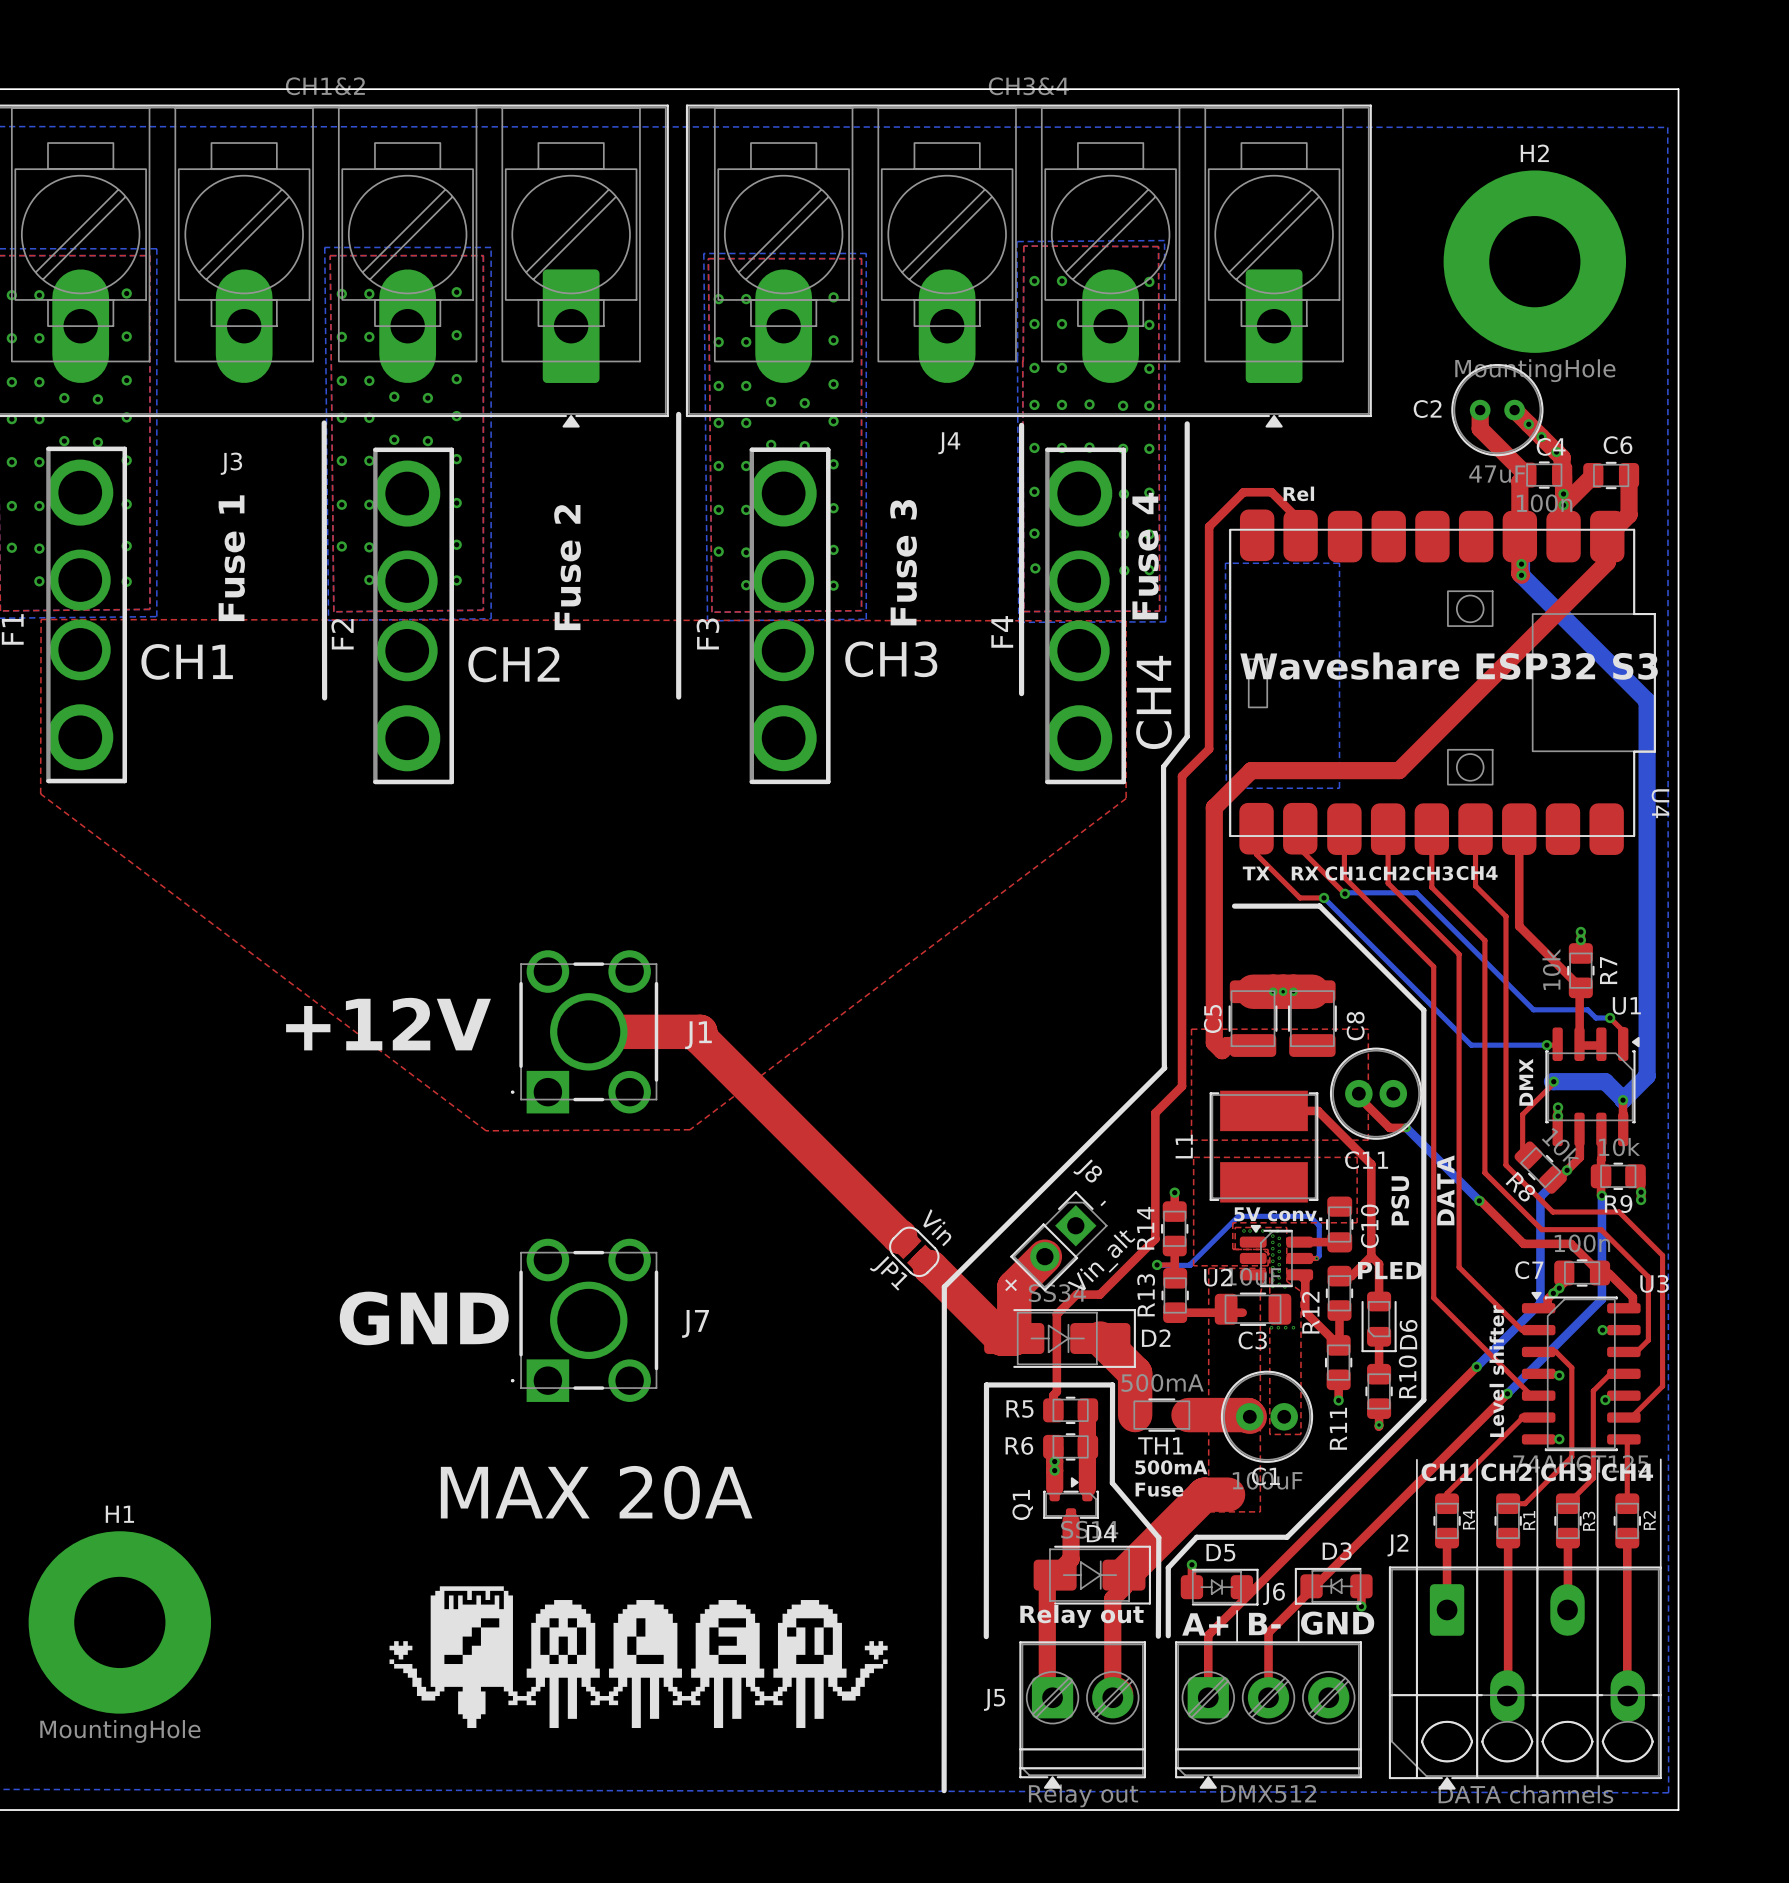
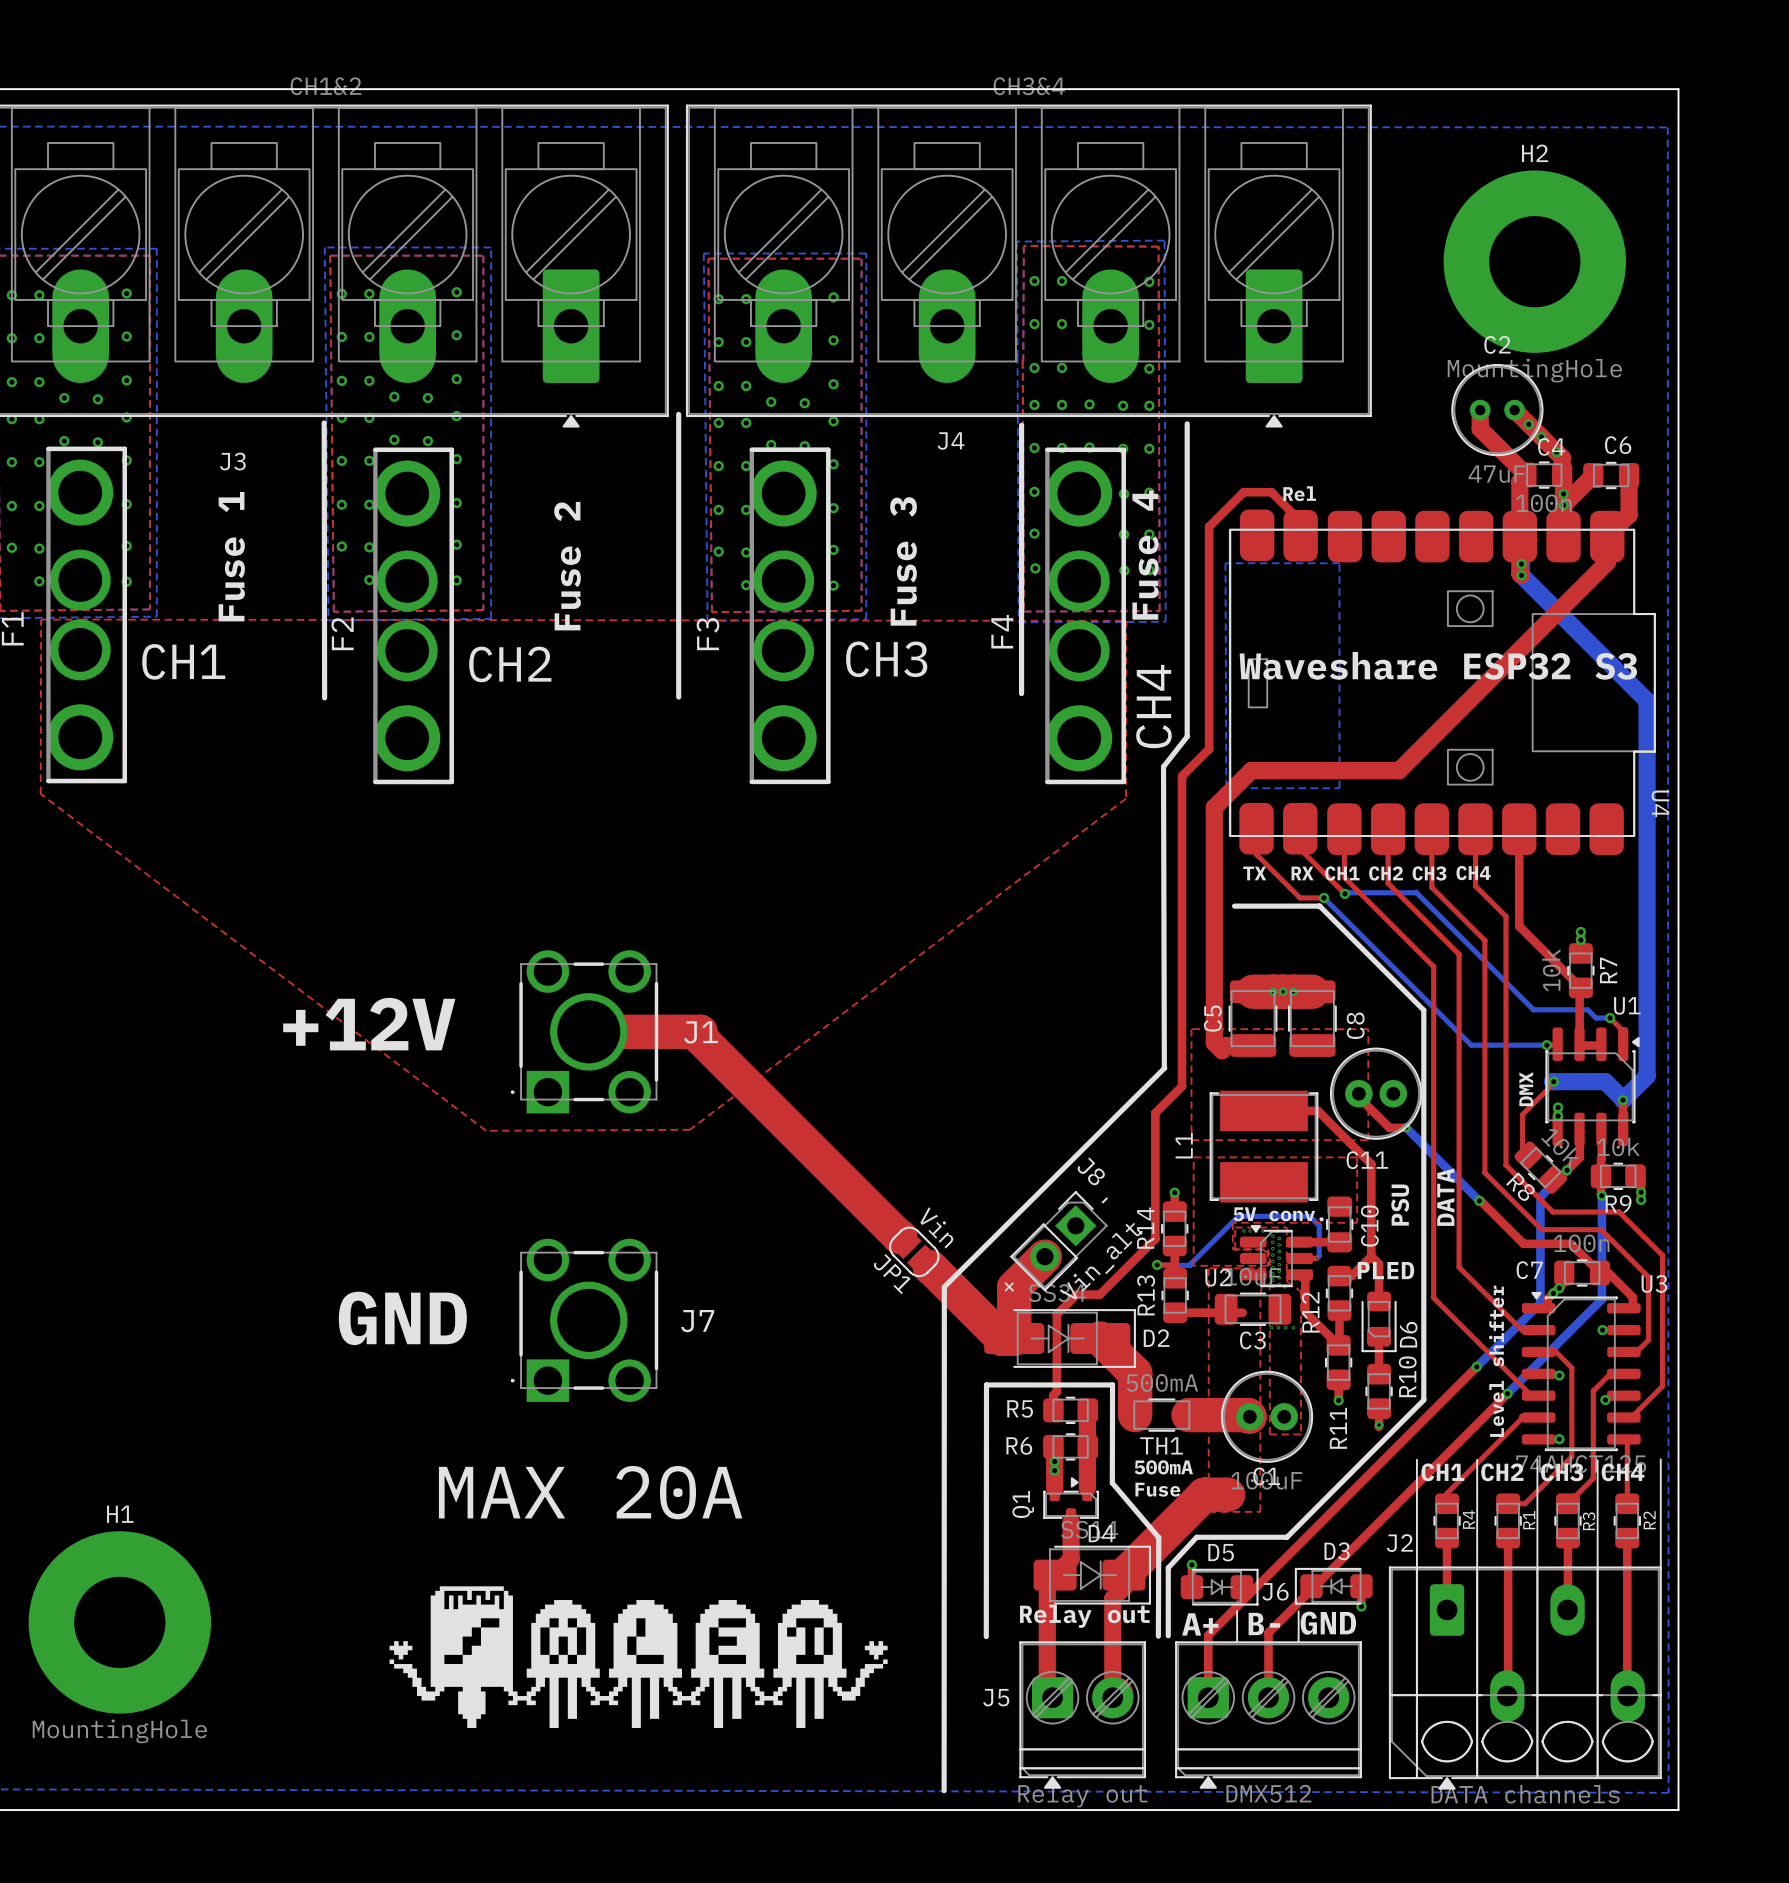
C2 name position: C2 (1427, 409) -> C2 (1497, 344)

